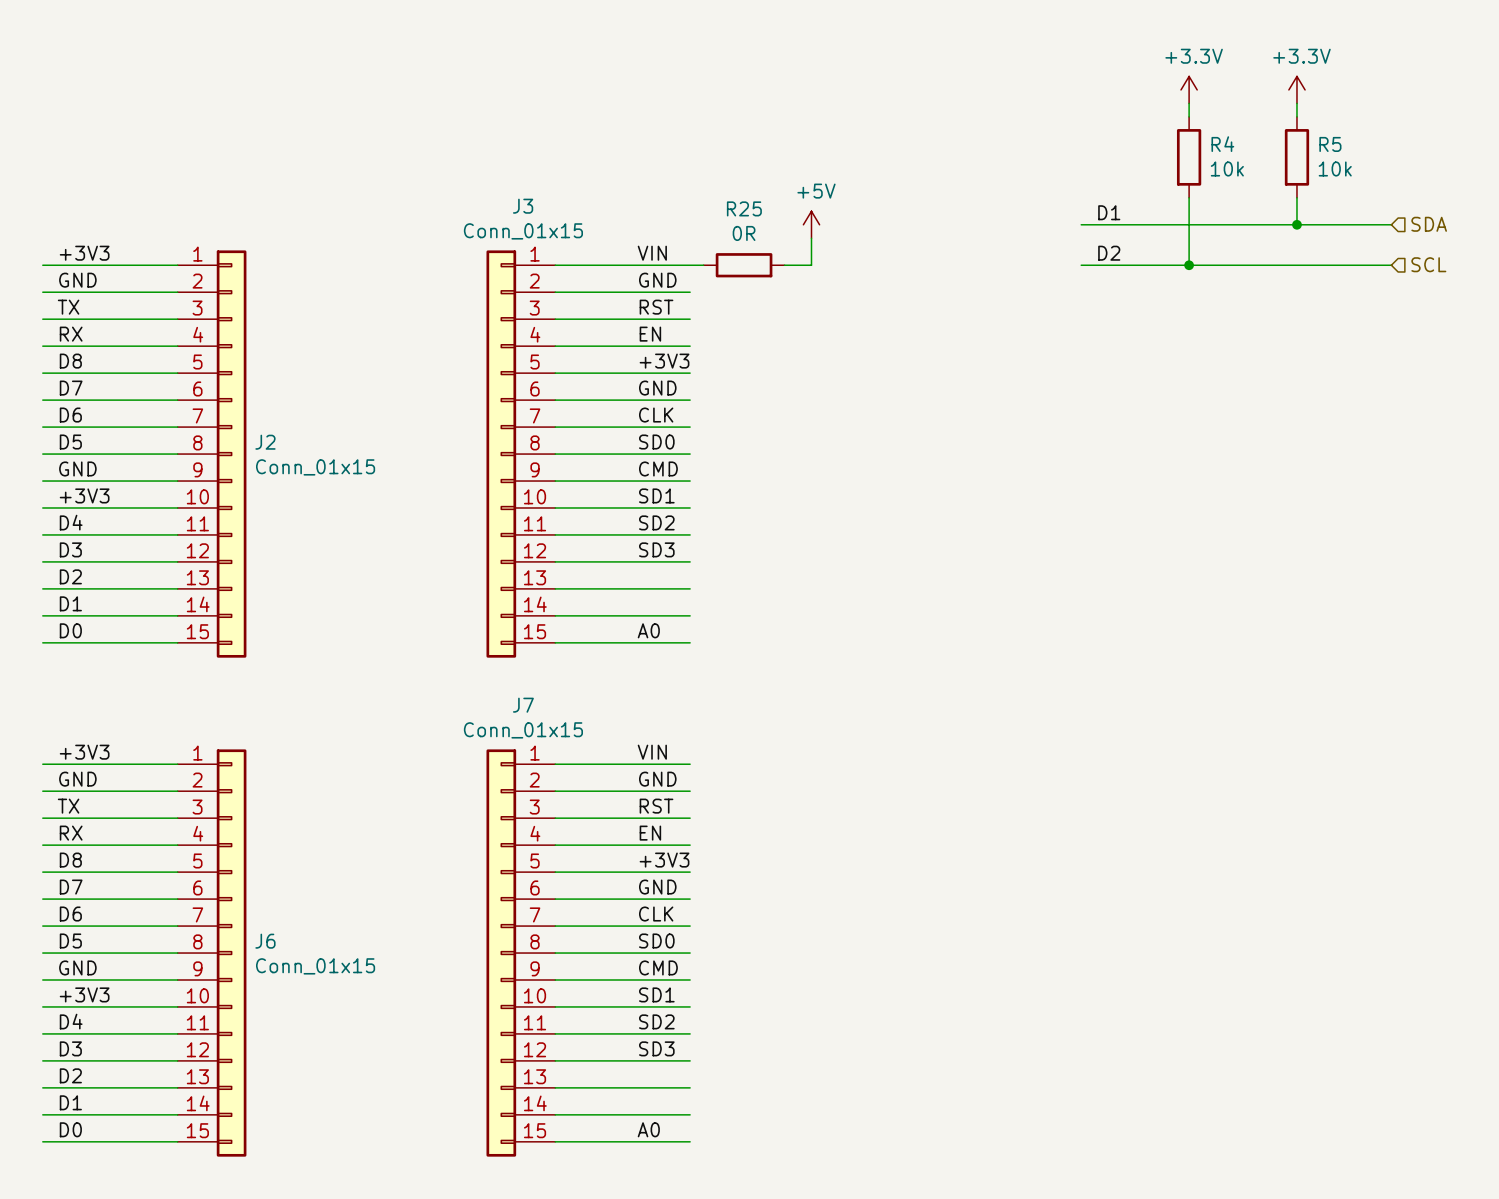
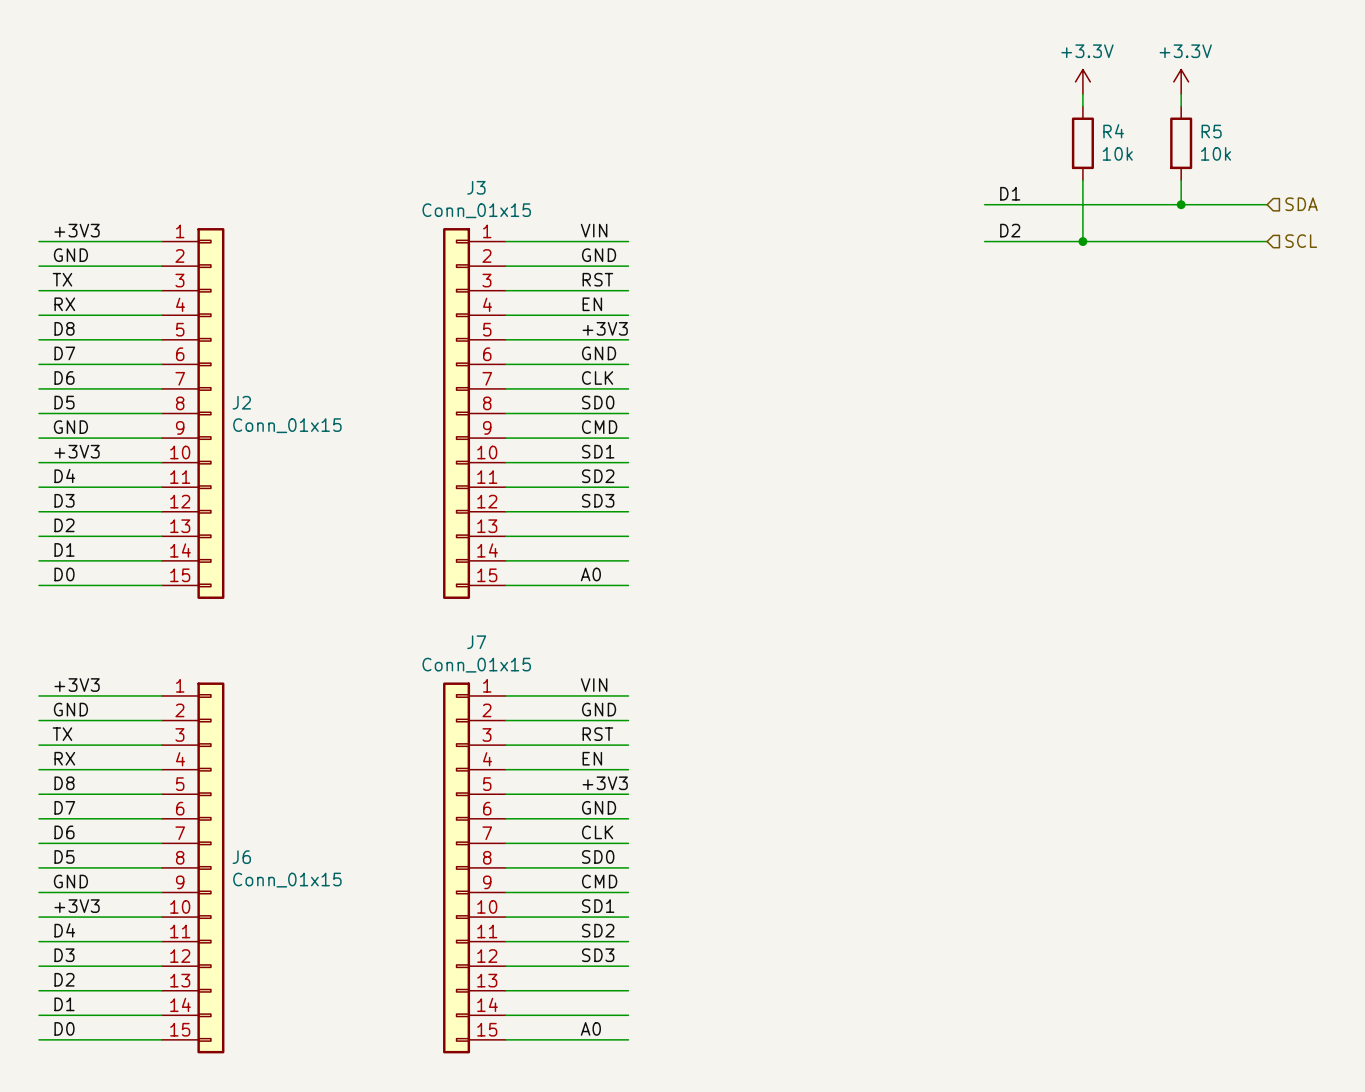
power symbol: +5V (811, 224) -> none
wire: (811, 238) (811, 265) (784, 265) -> none
wire: (690, 265) (703, 265) -> none
R25: 0R (744, 265) -> none

